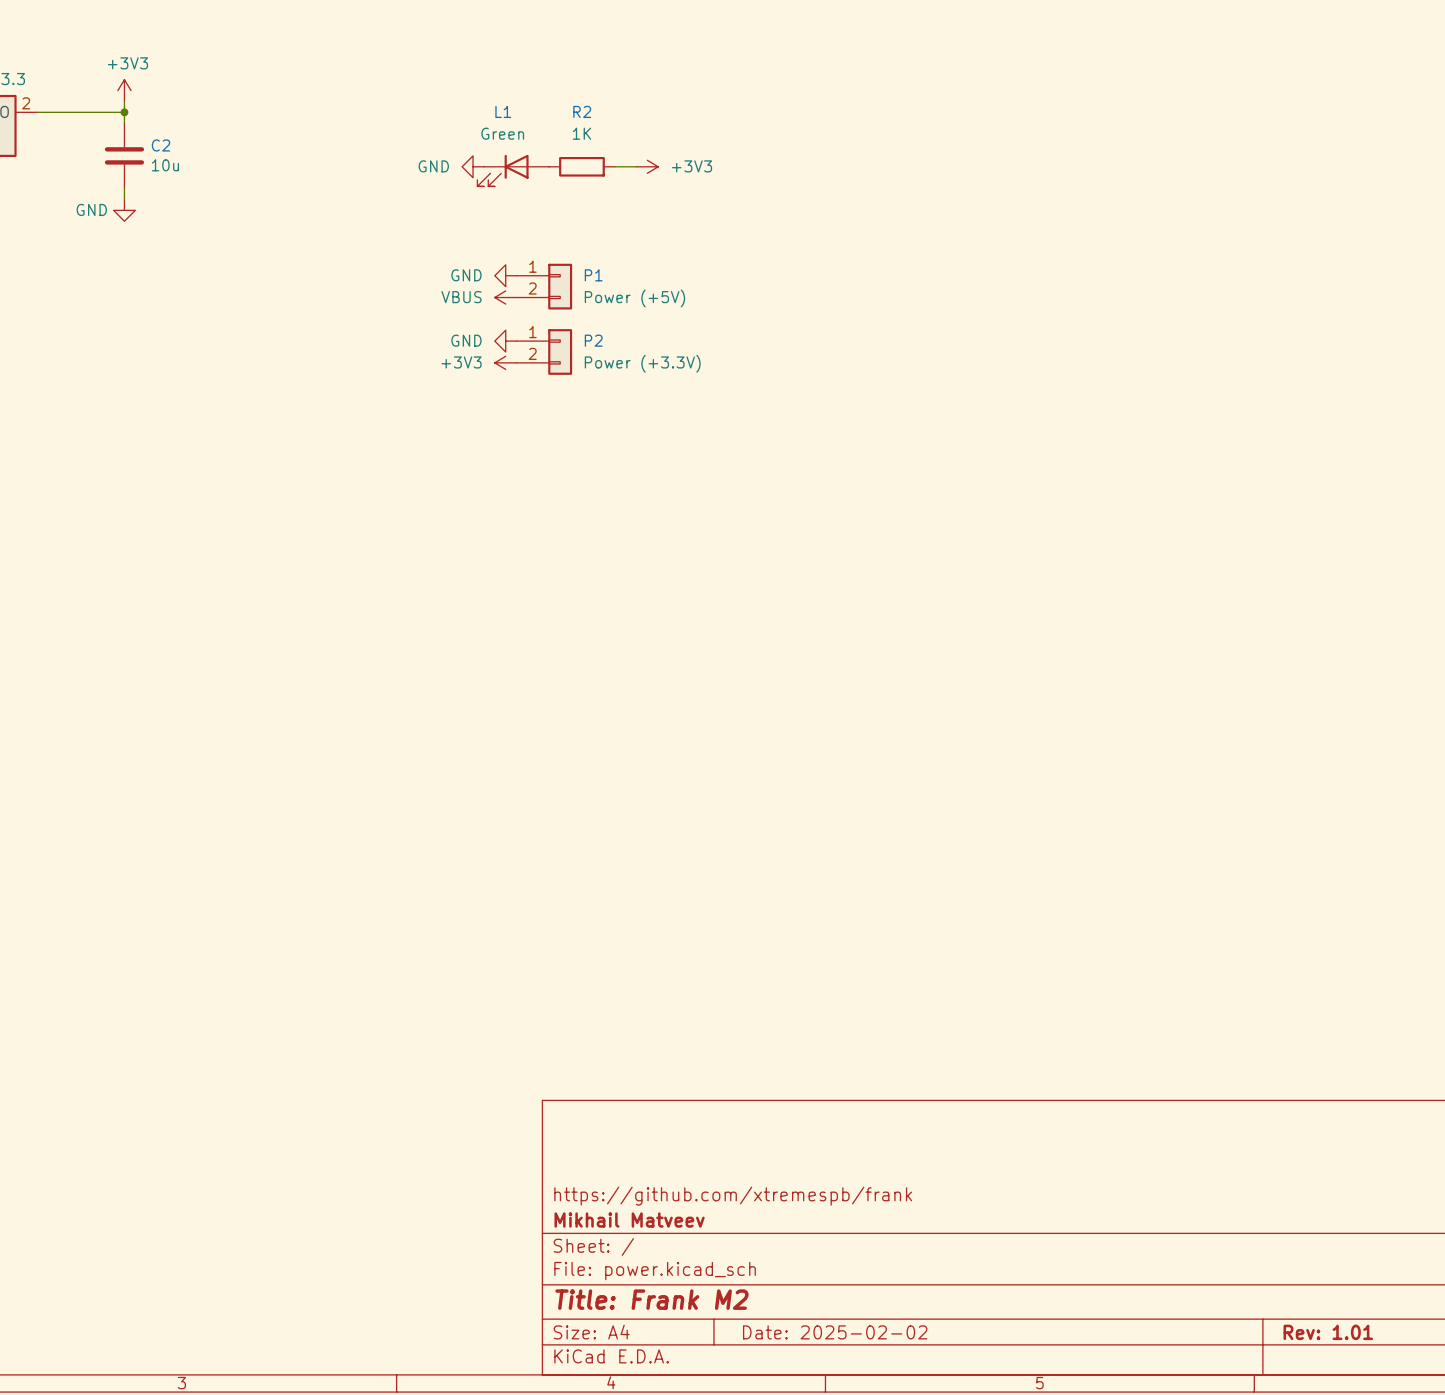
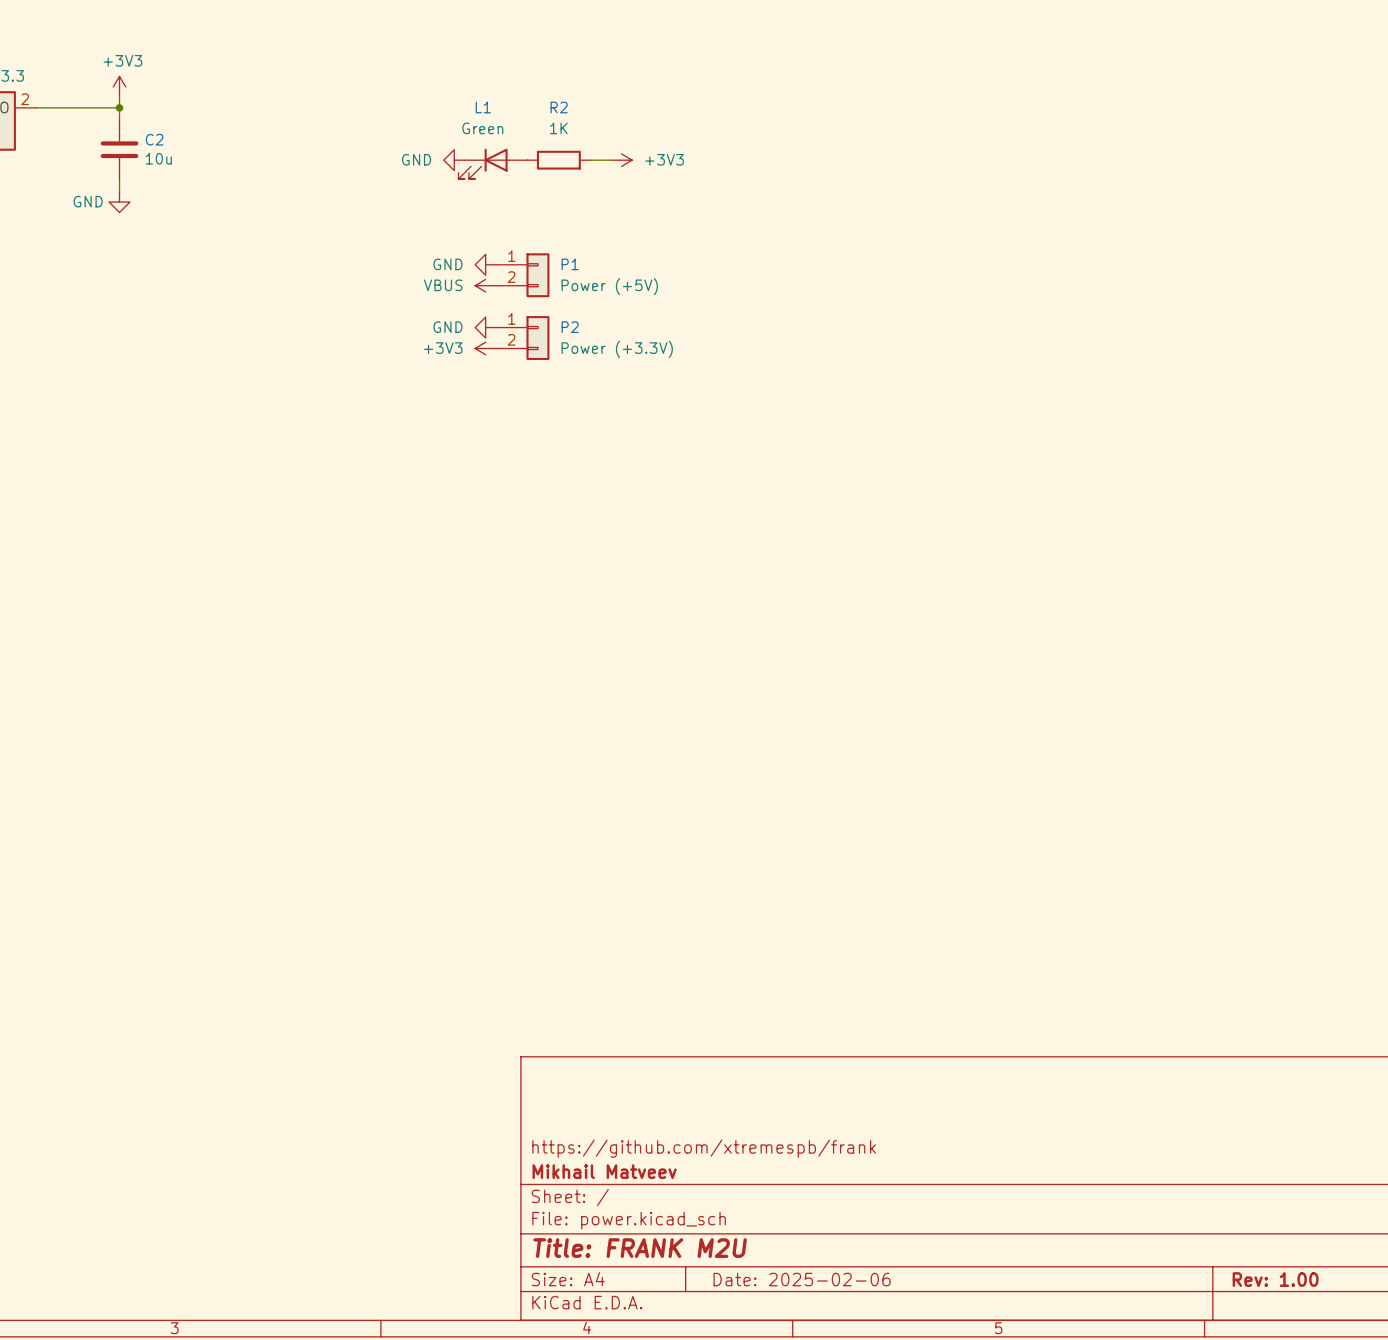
title block: Title: Frank M2 (651, 1299) -> Title: FRANK M2U (640, 1248)
title block: Date: 2025-02-02 (835, 1332) -> Date: 2025-02-06 (802, 1279)
title block: Rev: 1.01 (1328, 1332) -> Rev: 1.00 (1275, 1279)

